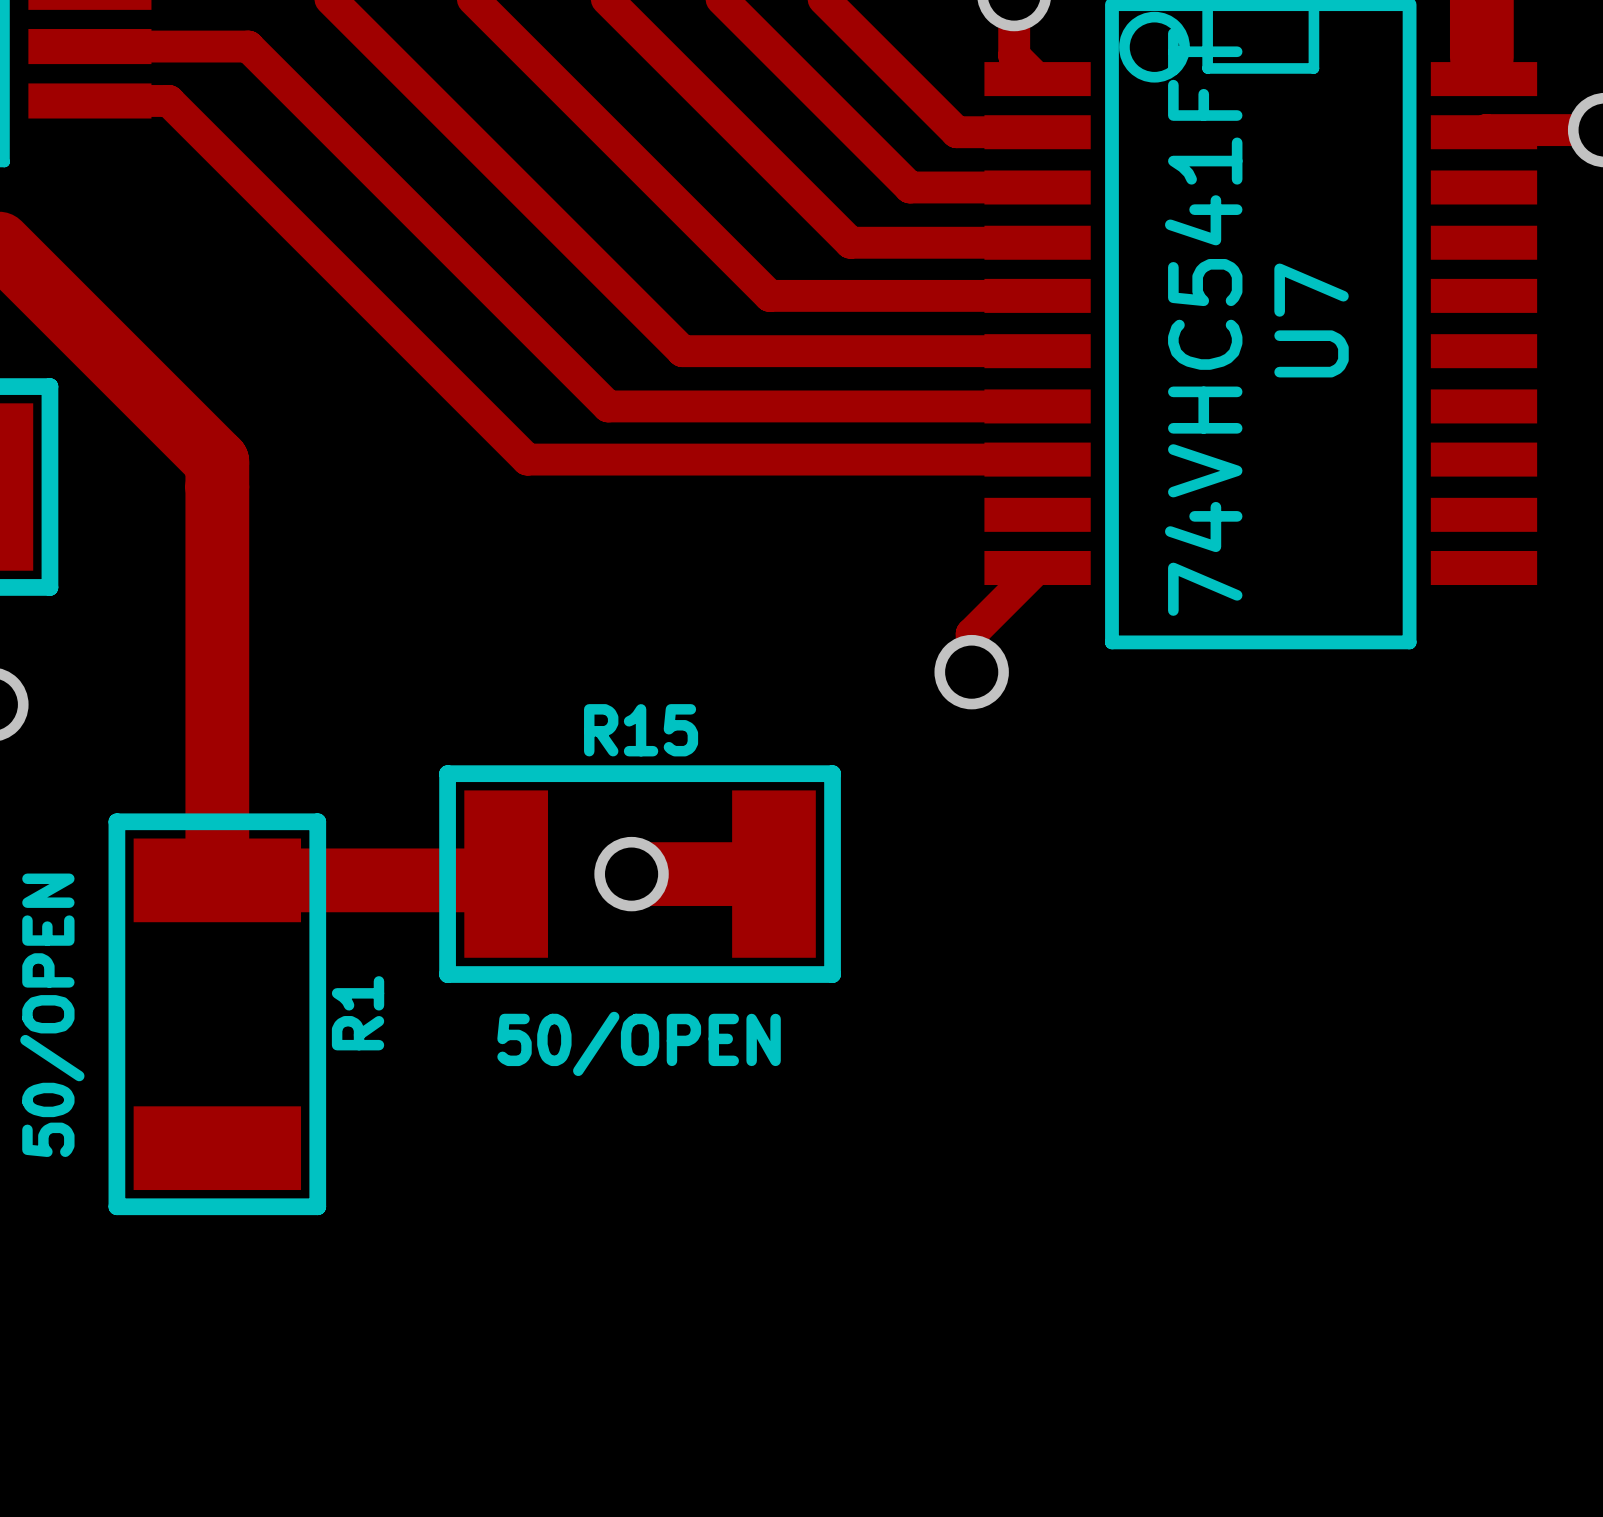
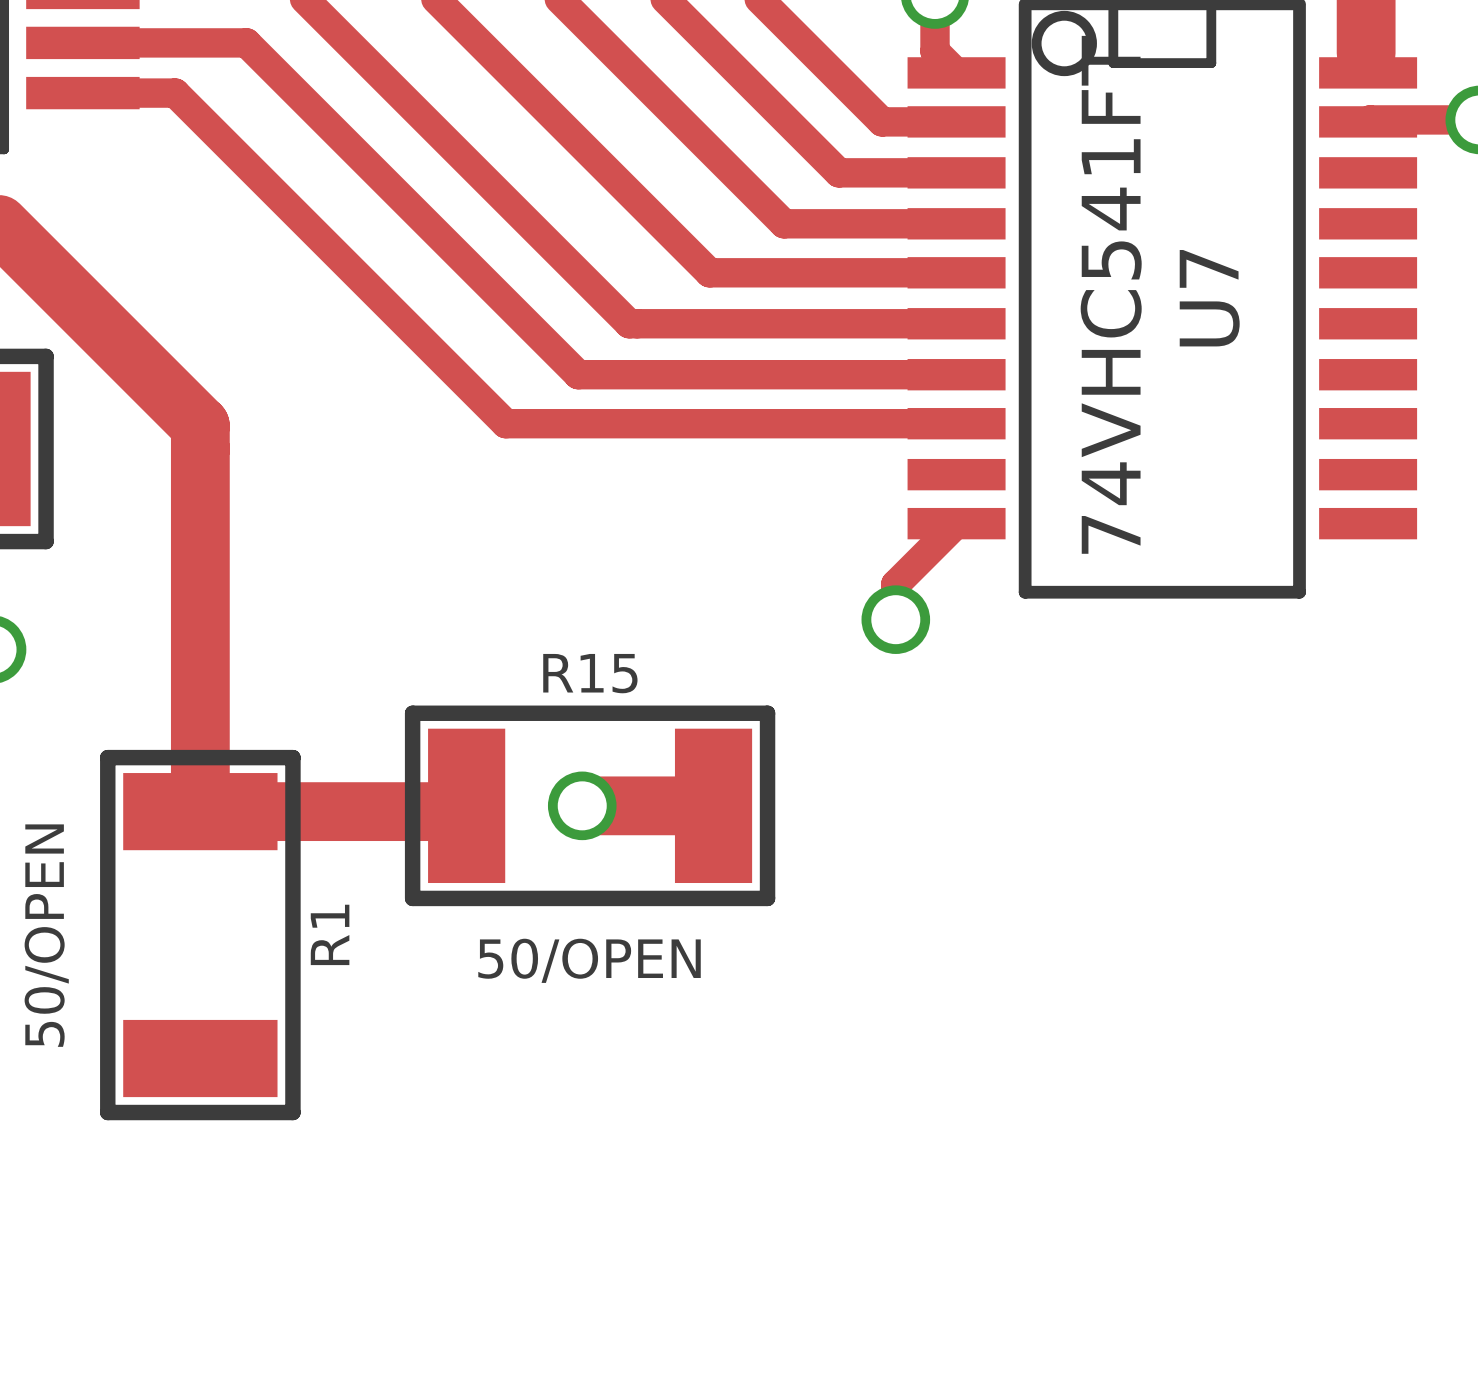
track: (248, 46) (608, 406) (627, 406) -> (228, 42) (246, 42) (578, 374)
track: (168, 100) (527, 459) (548, 459) -> (155, 93) (175, 93) (505, 423)

